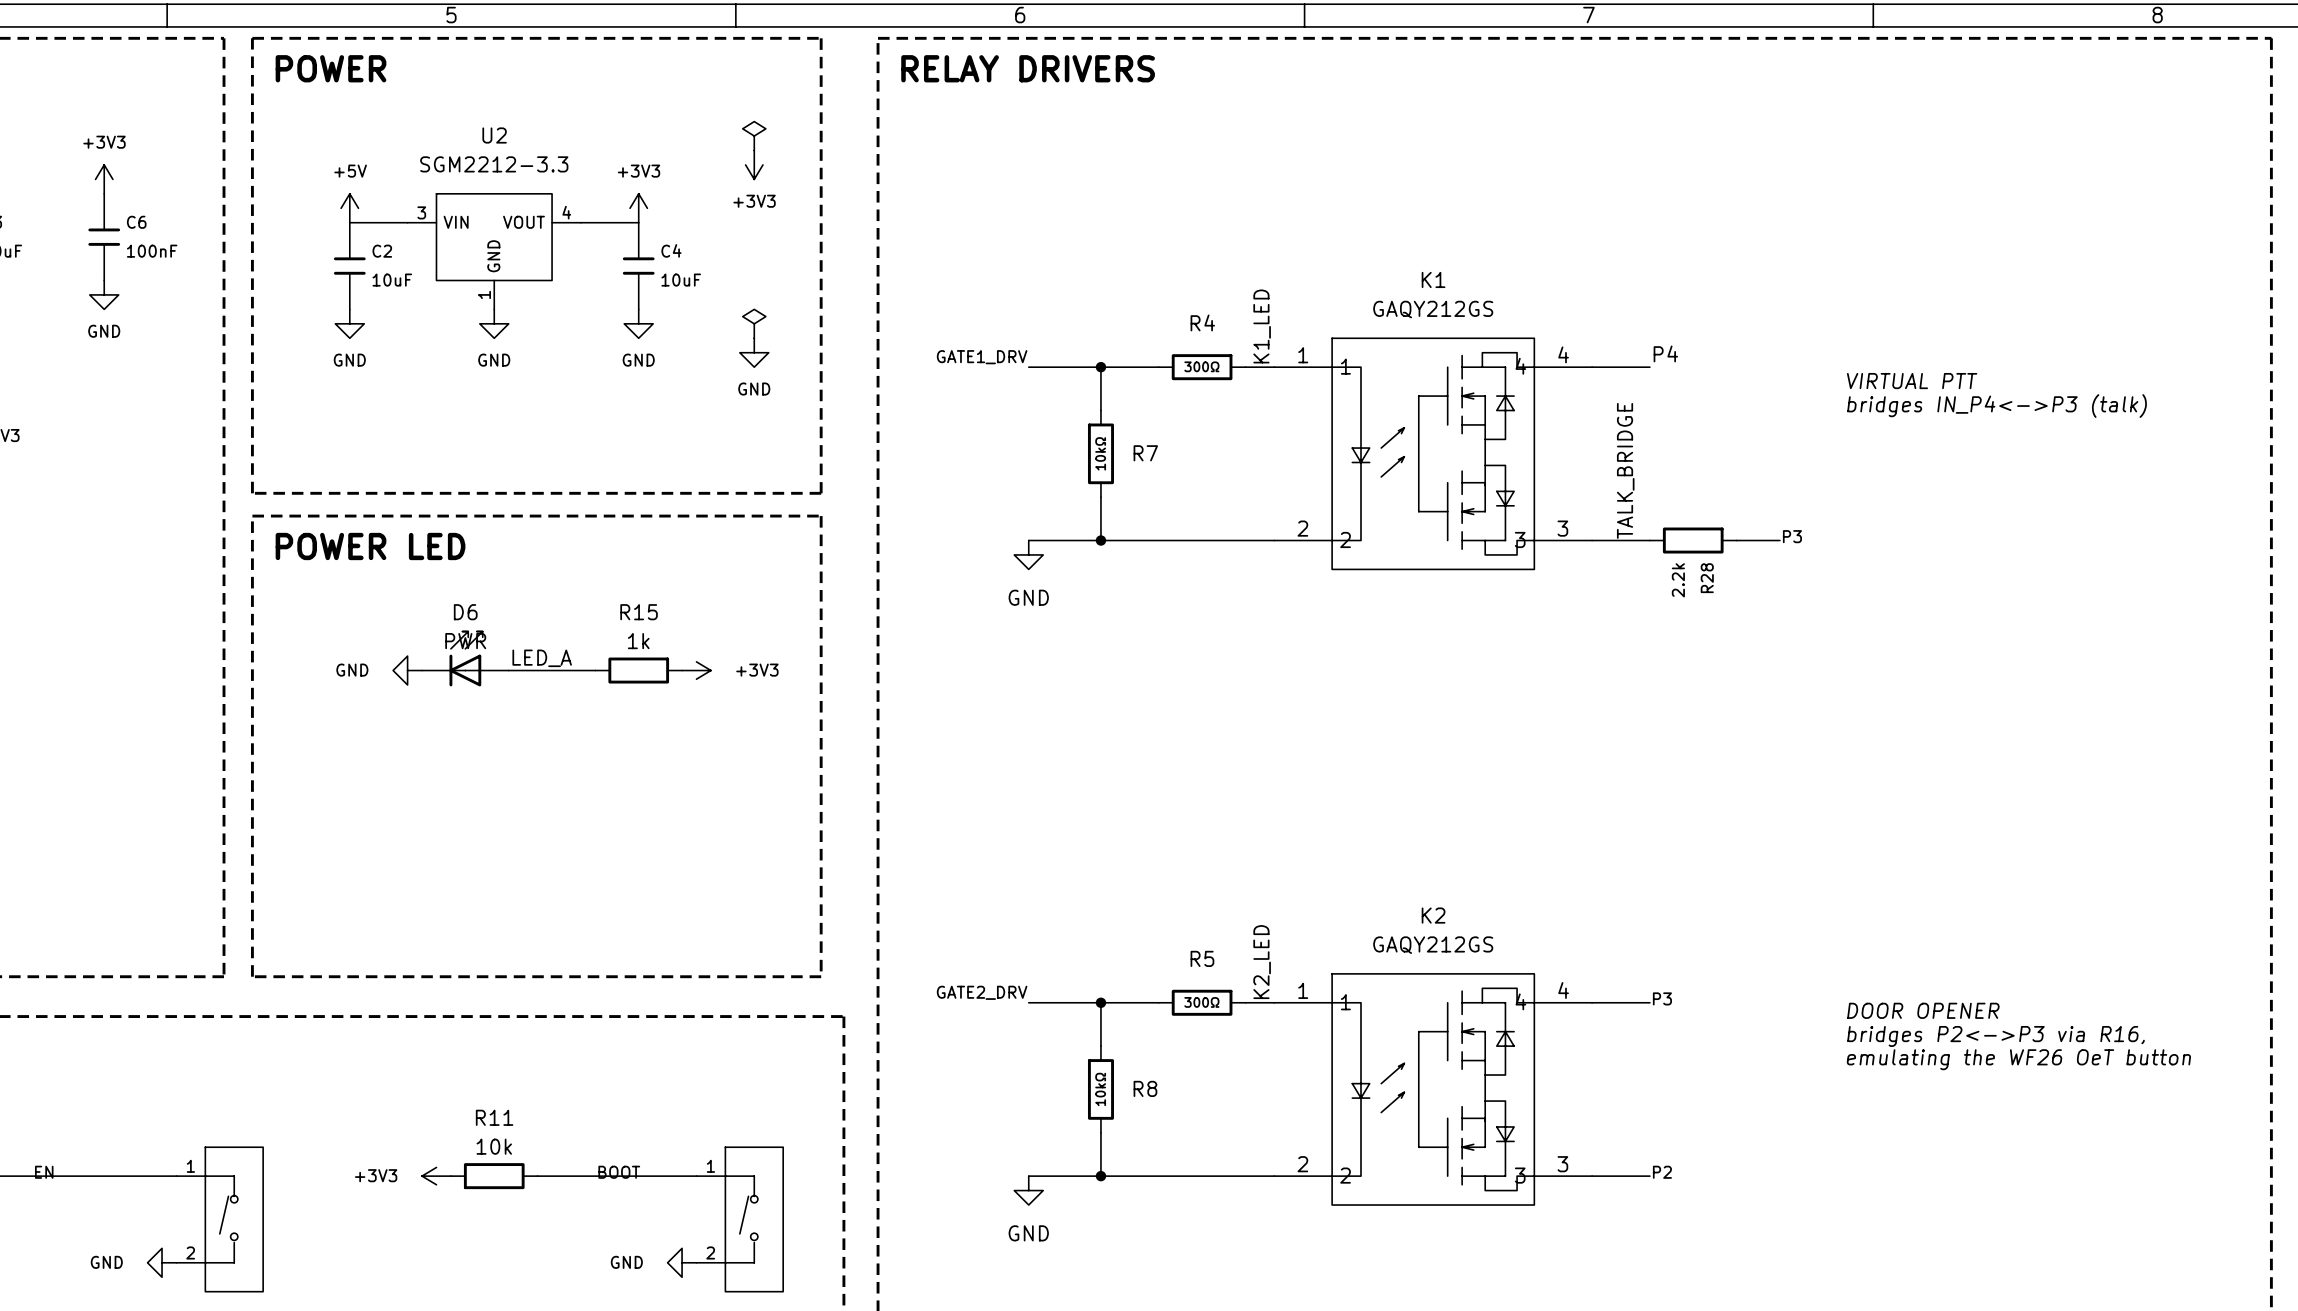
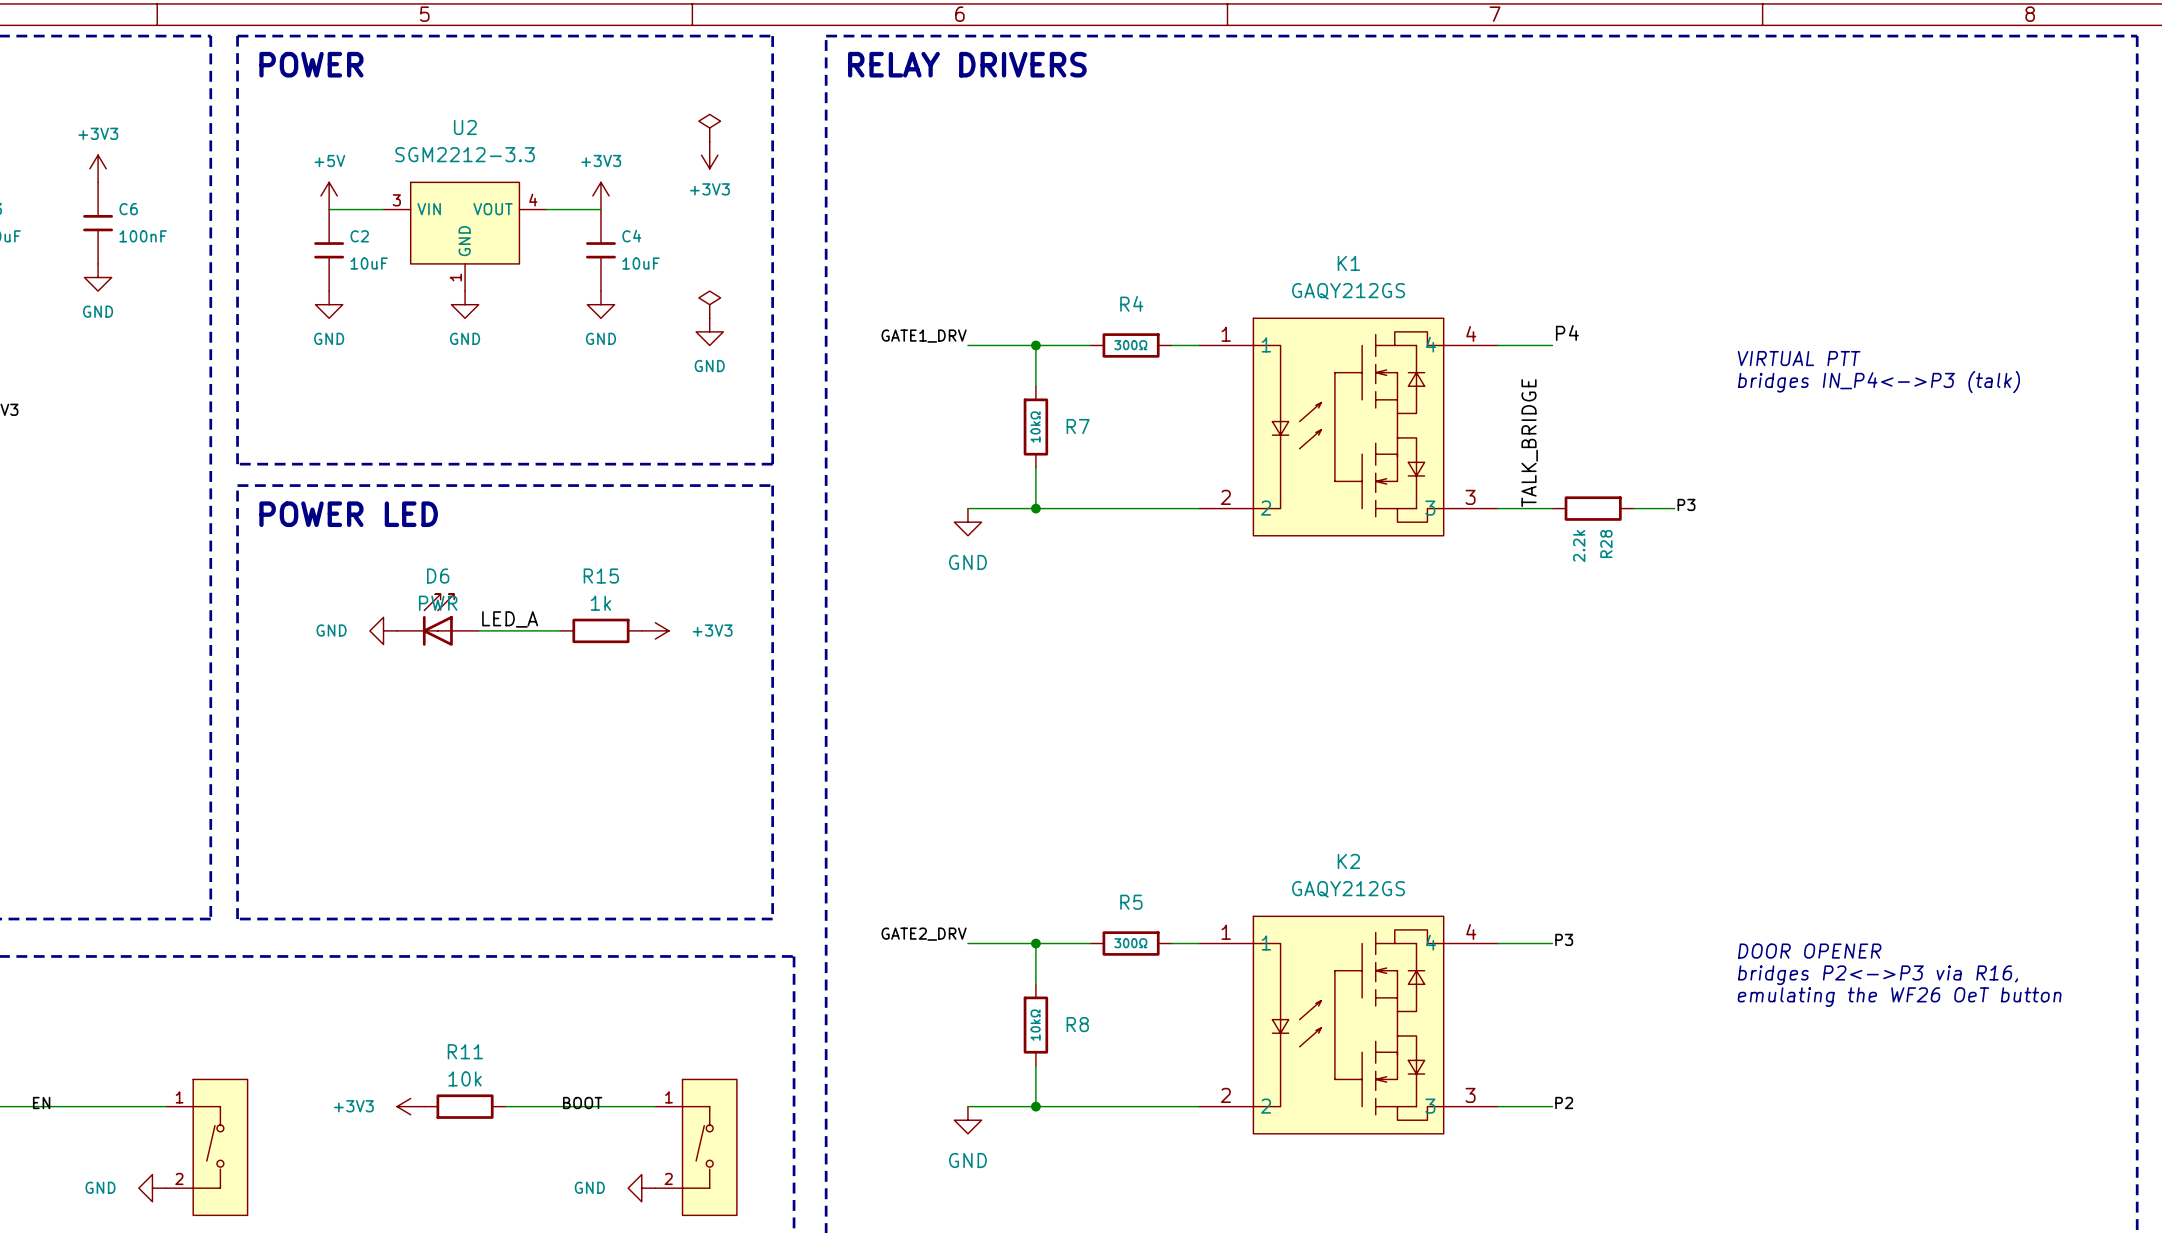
label: K1_LED (1262, 326) -> none
label: K2_LED (1262, 962) -> none

